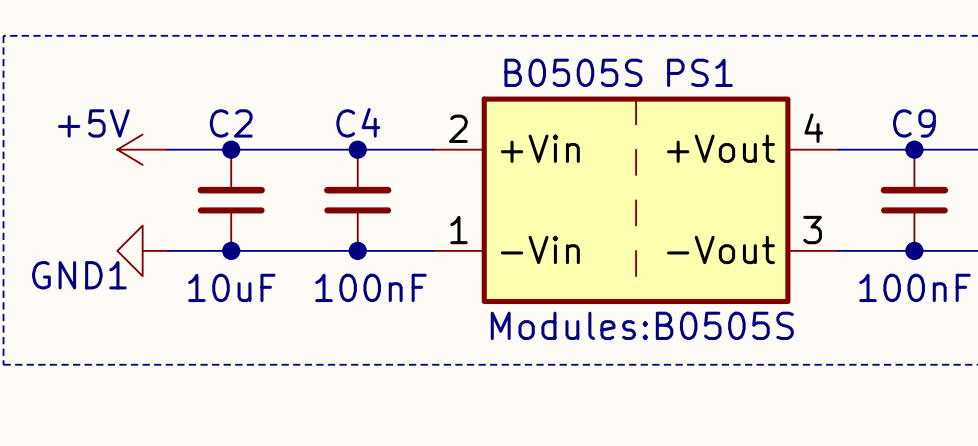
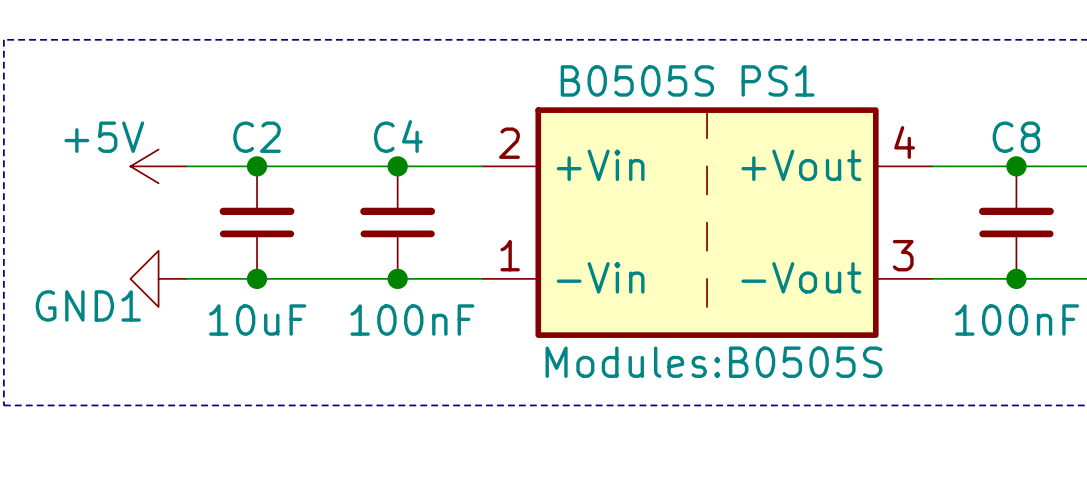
C9 name: C9 (914, 123) -> C8 (1016, 137)

